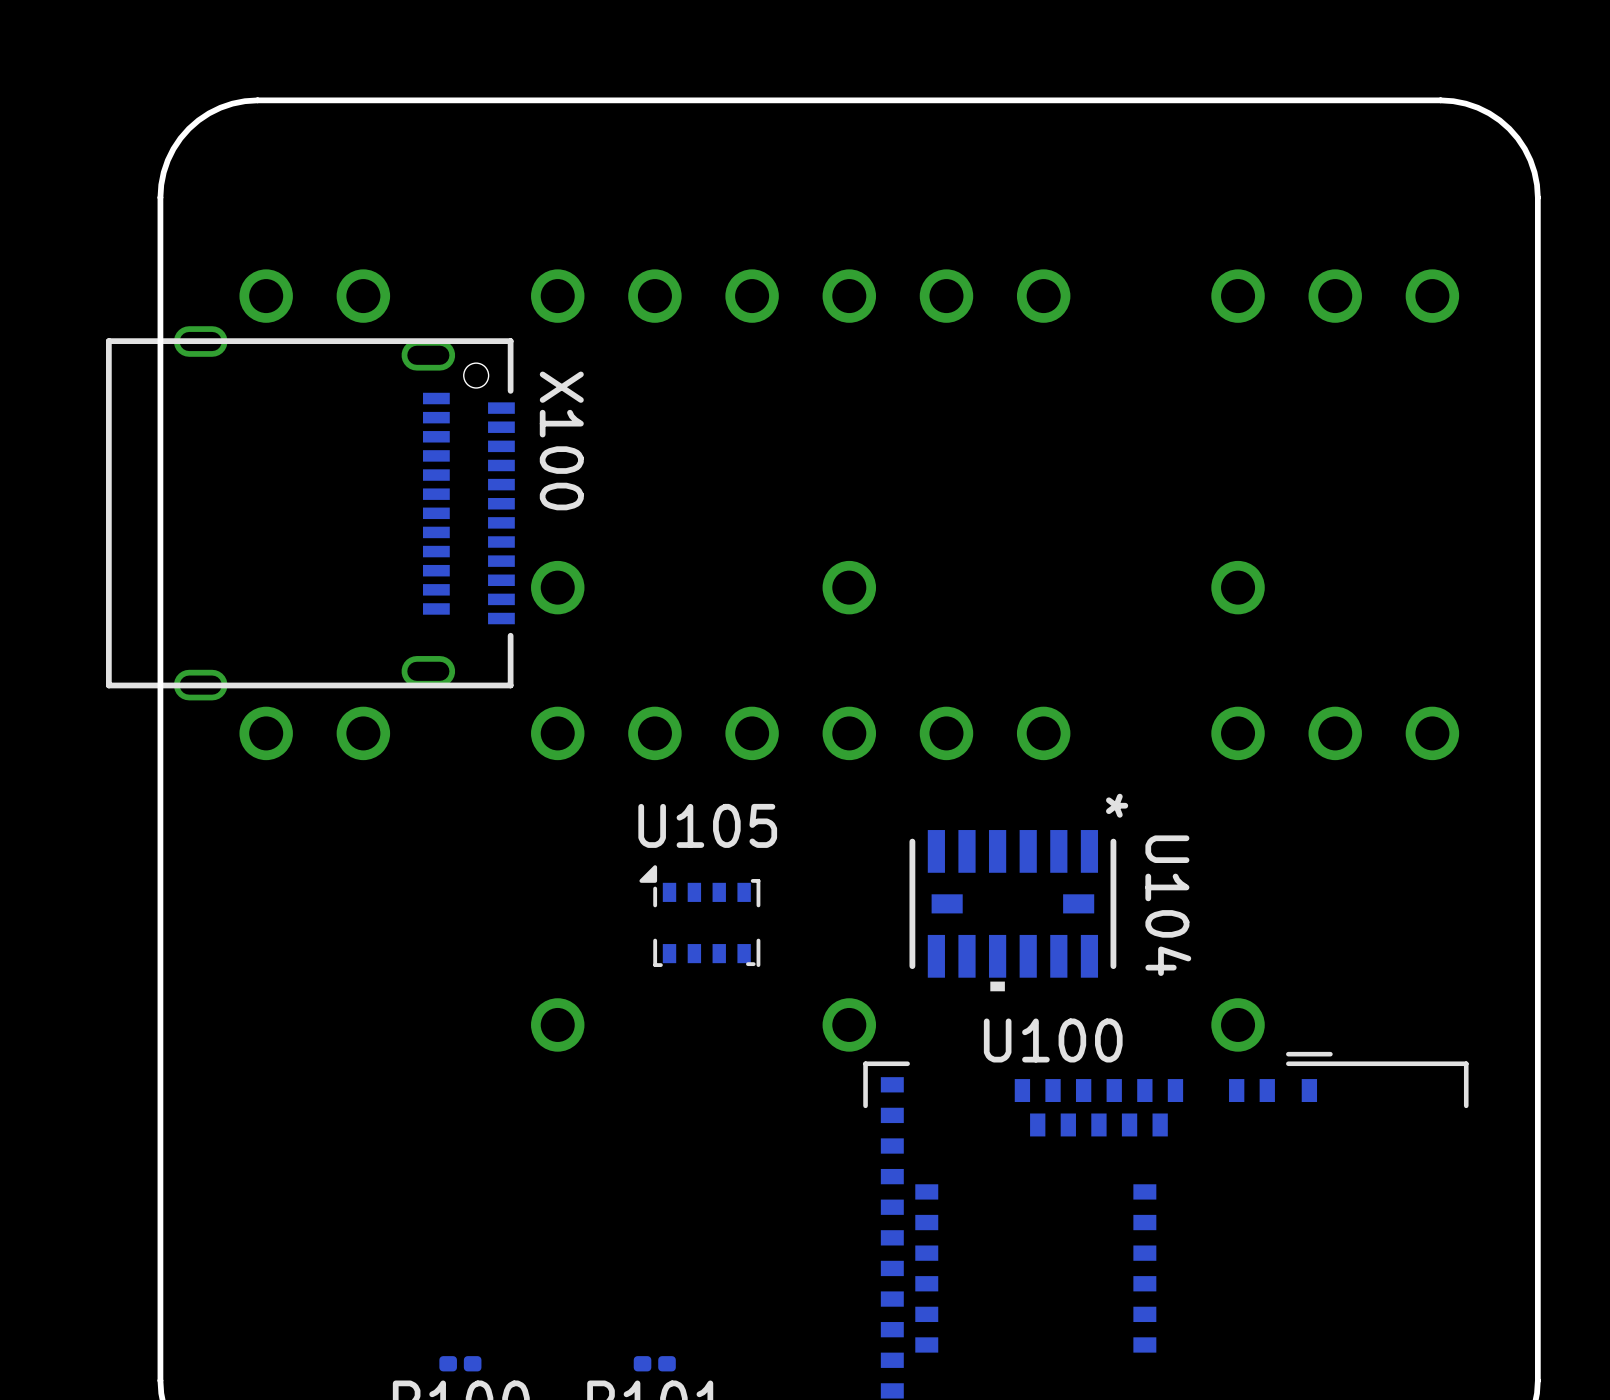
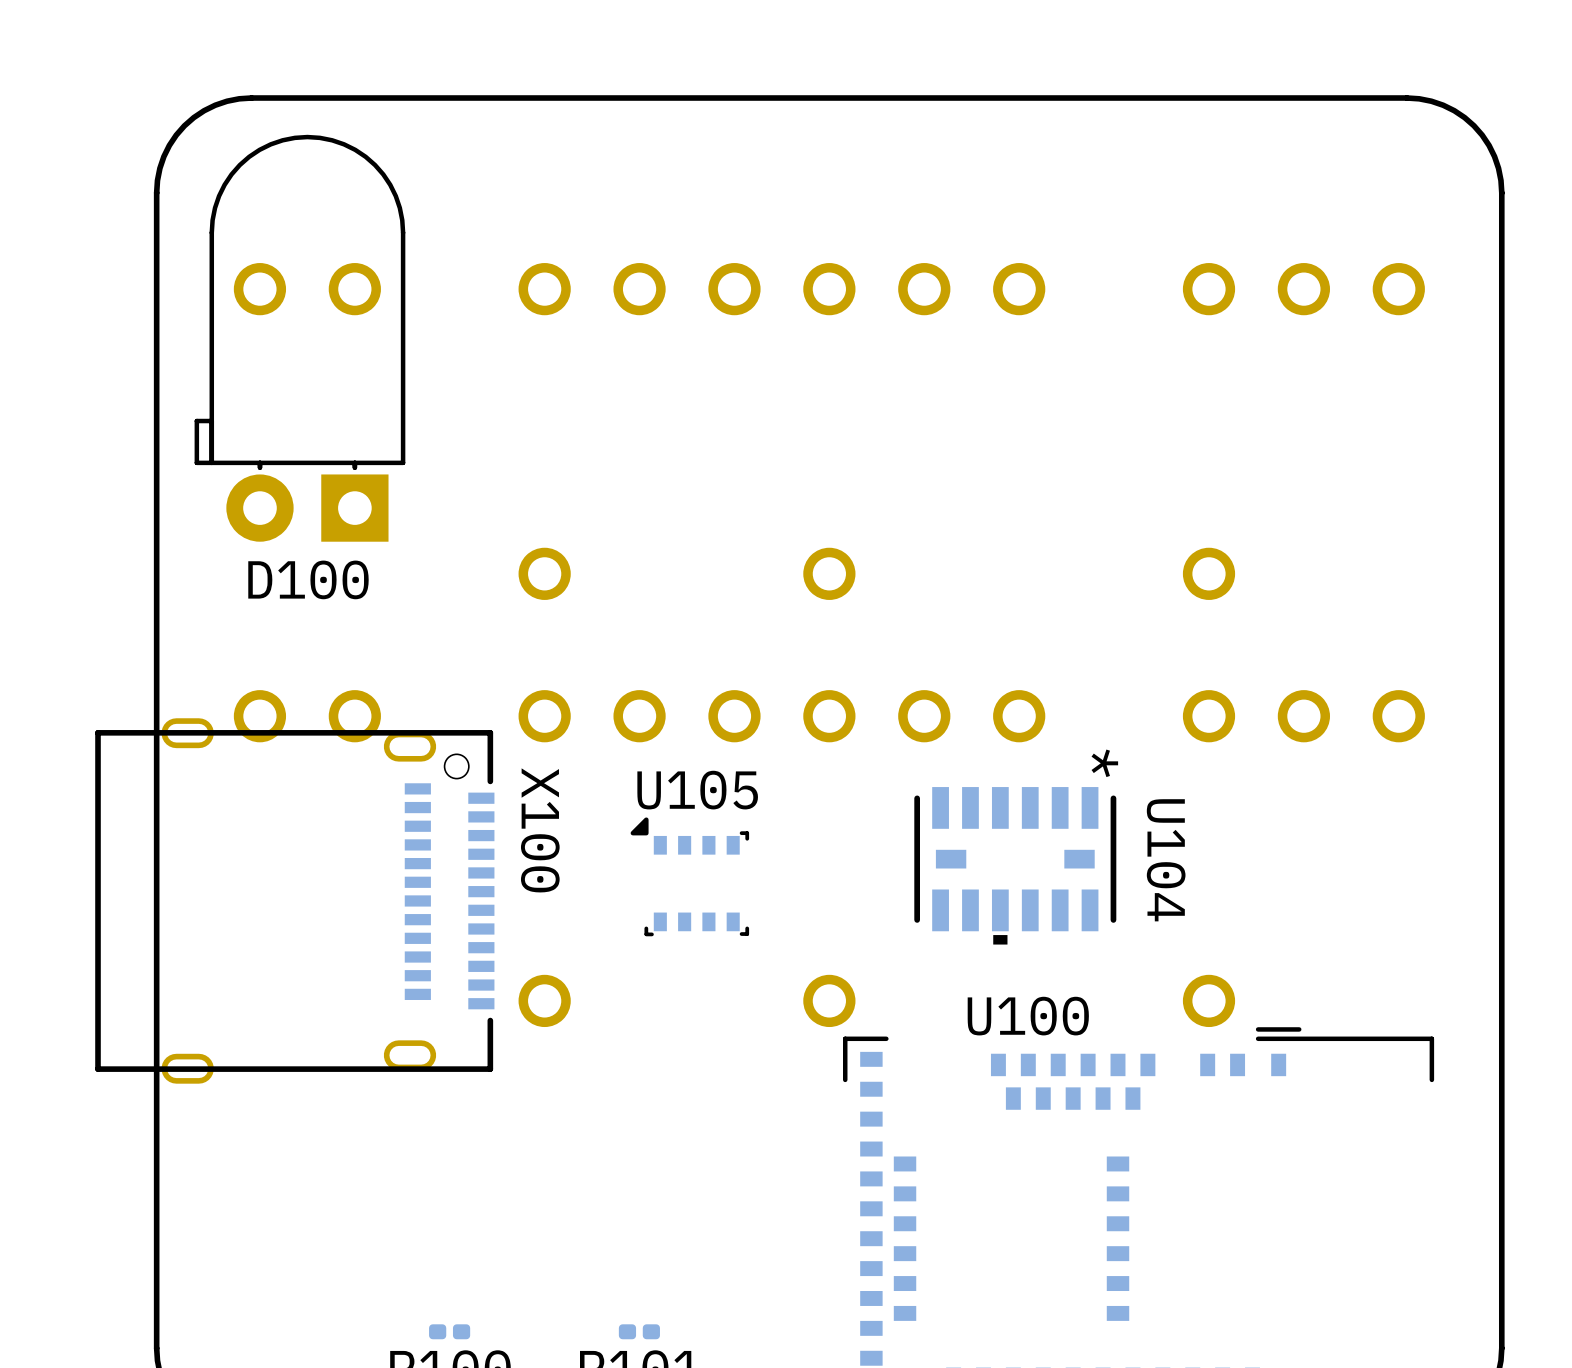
D100: none -> (299, 338)
X100 position: (310, 513) -> (294, 900)
U105 footprint: [639, 865, 761, 967] -> [630, 817, 750, 937]
U104 position: (1012, 910) -> (1015, 865)

